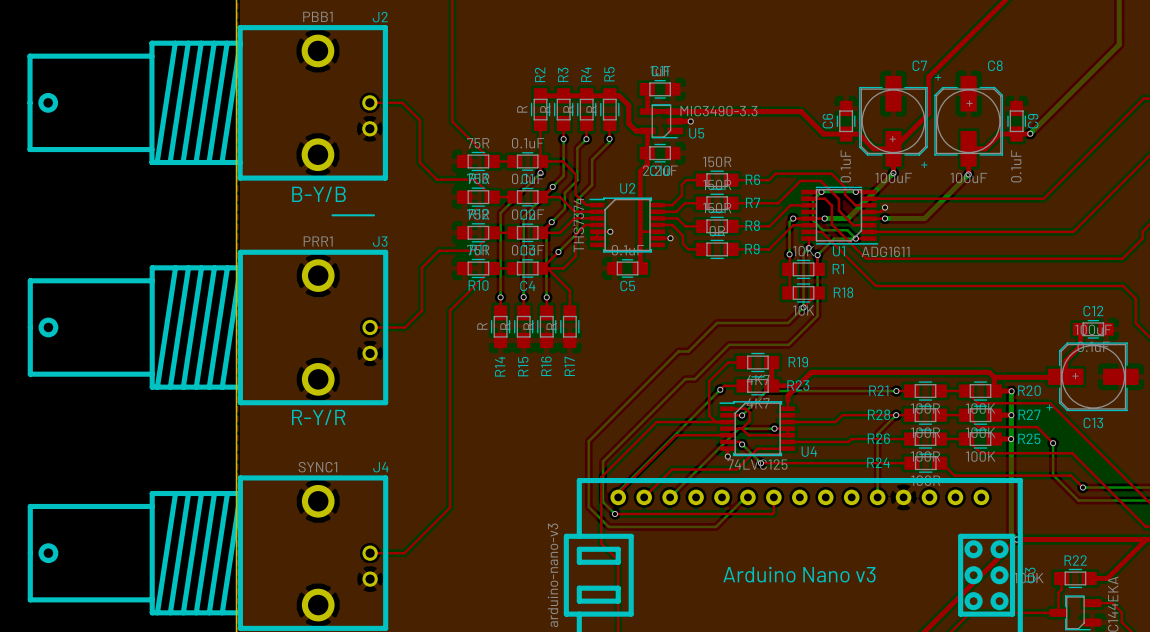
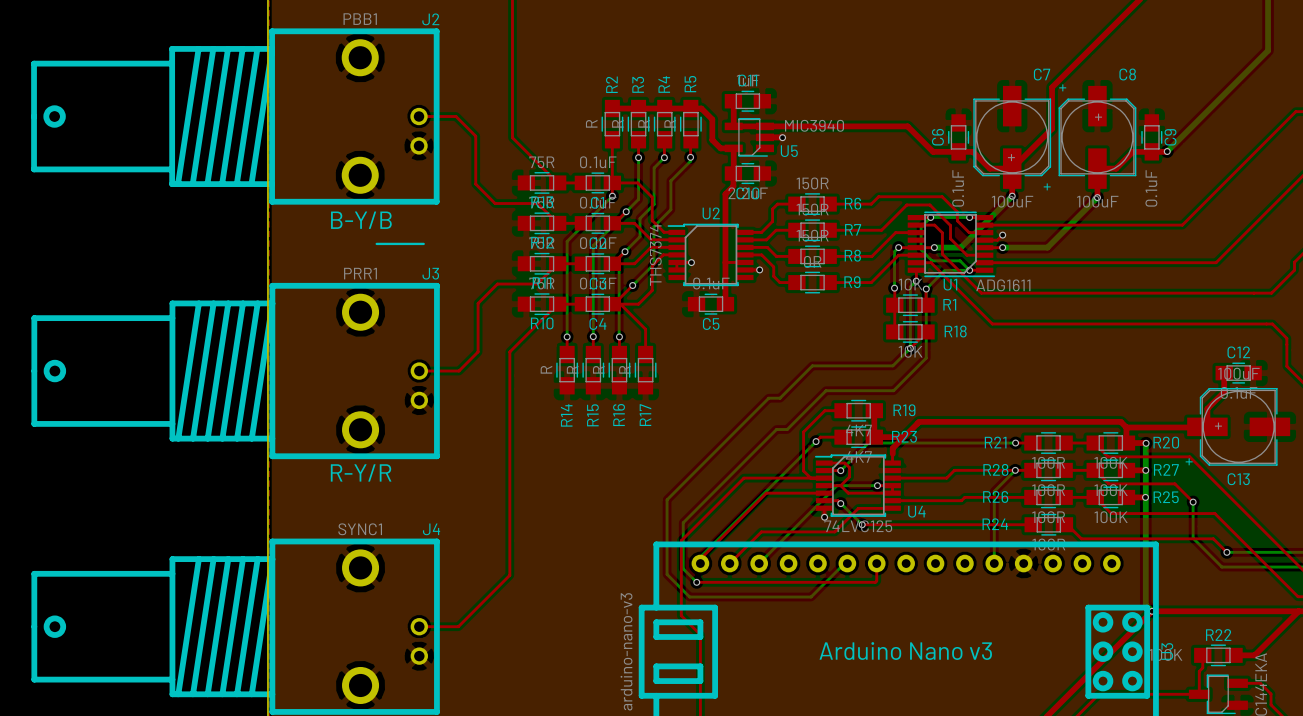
U5 value: MIC3490-3.3 (718, 111) -> MIC3940 (814, 125)

